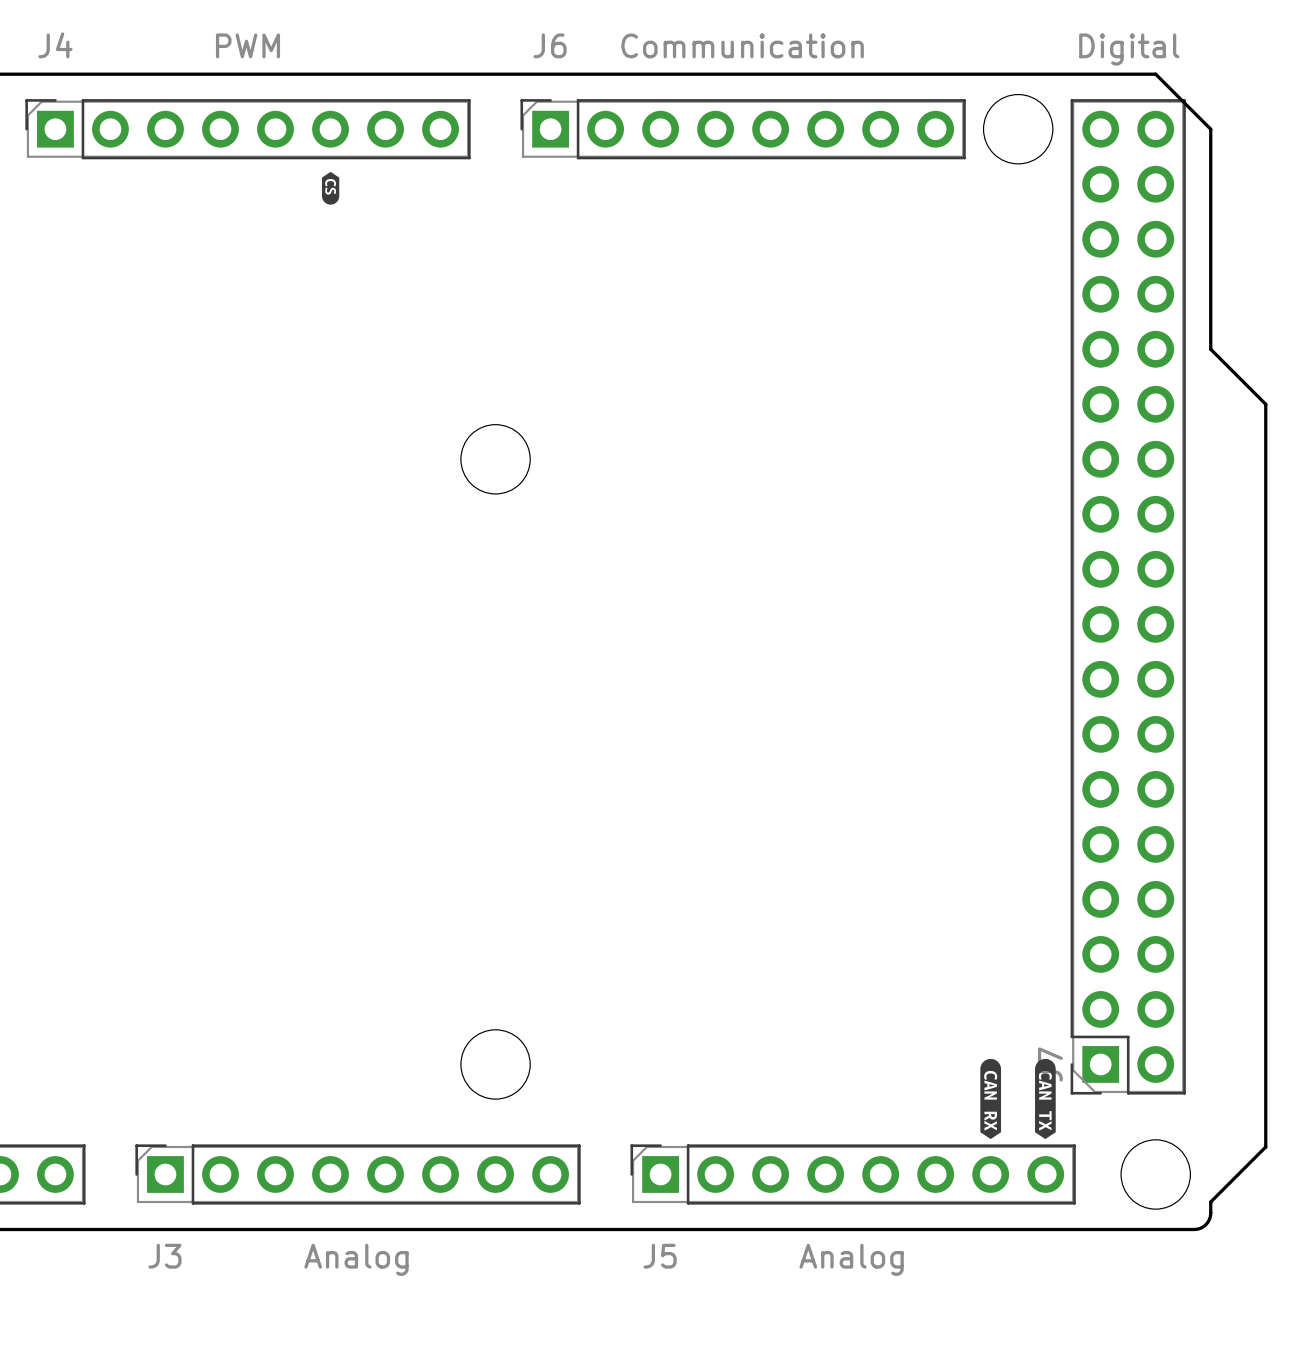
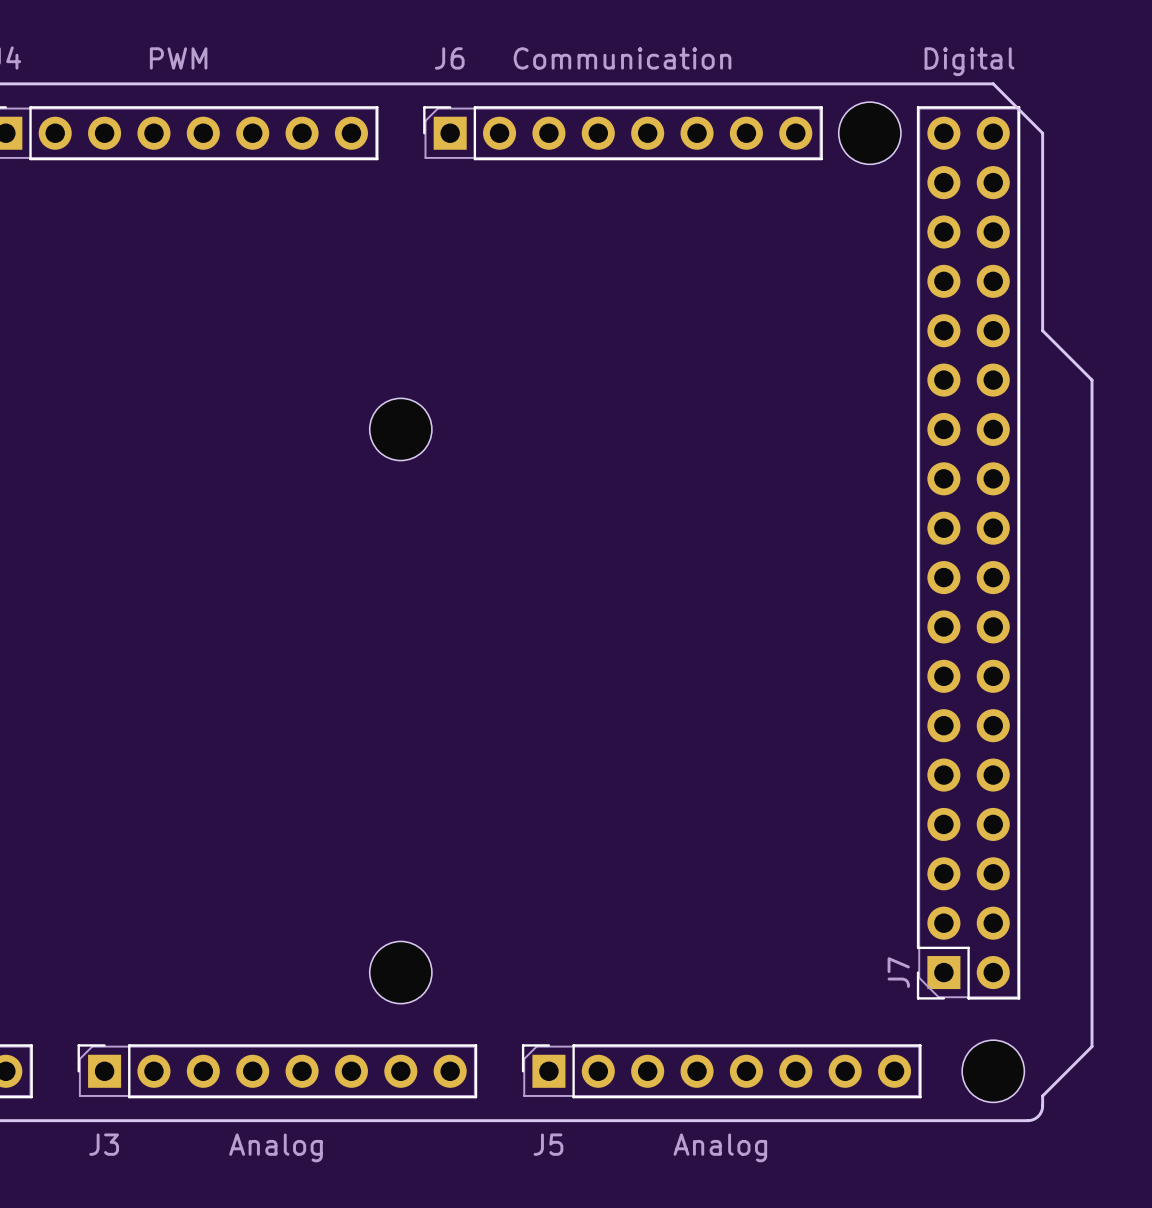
drawing: [321, 171, 340, 205] -> none
drawing: [980, 1058, 1002, 1140] -> none
drawing: [1035, 1058, 1056, 1140] -> none

